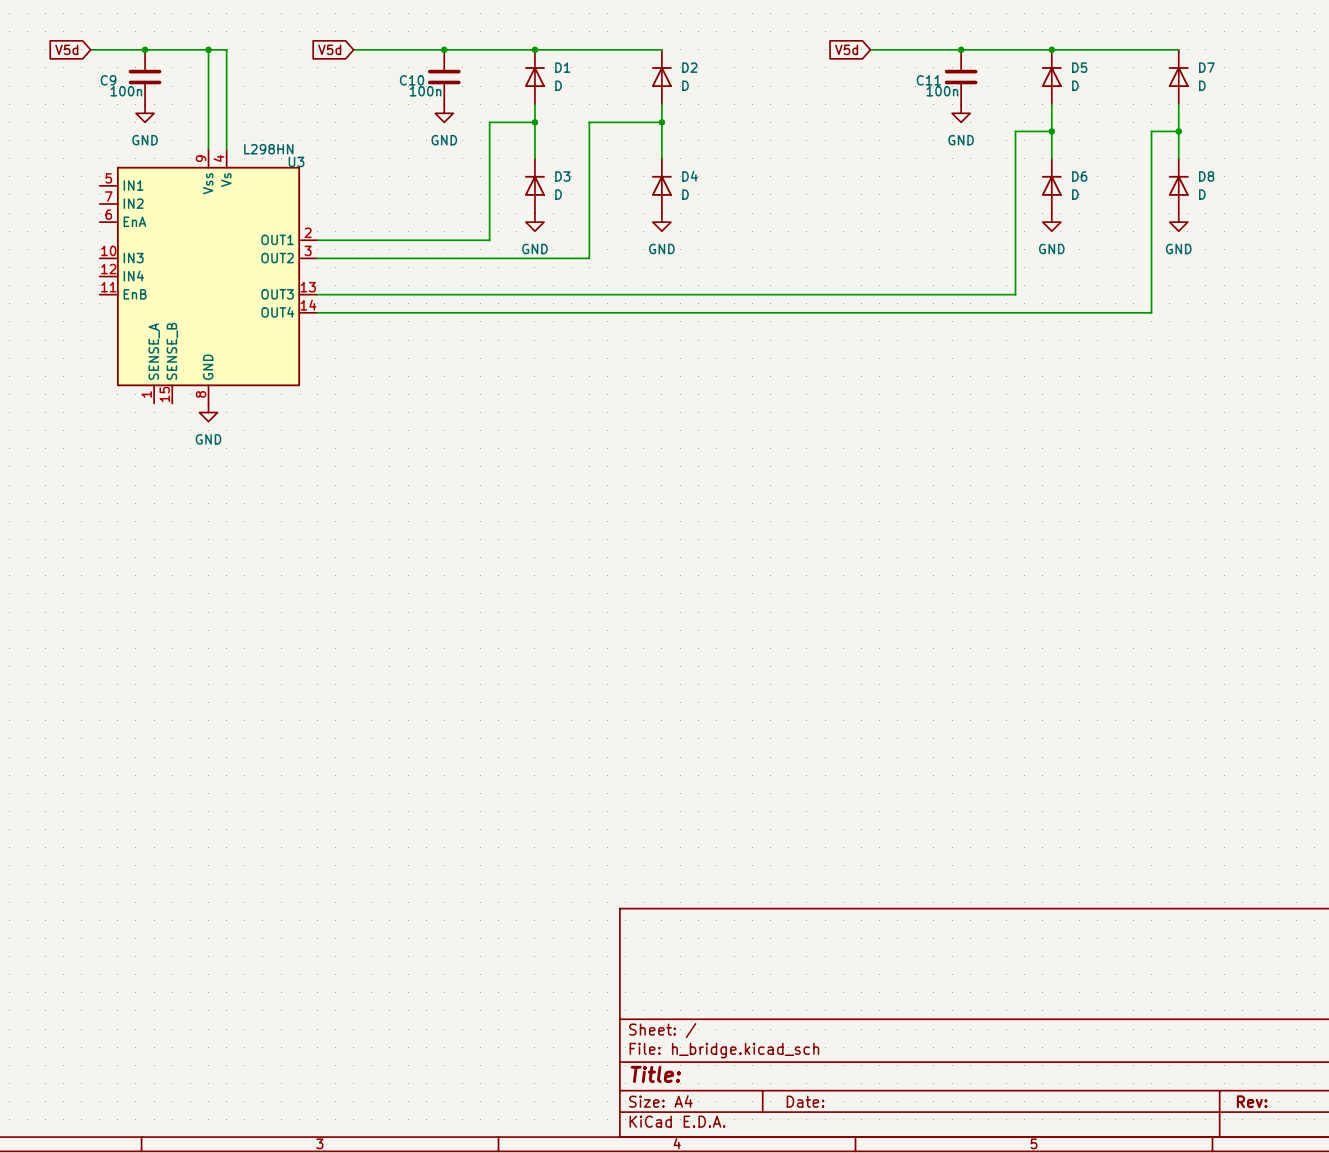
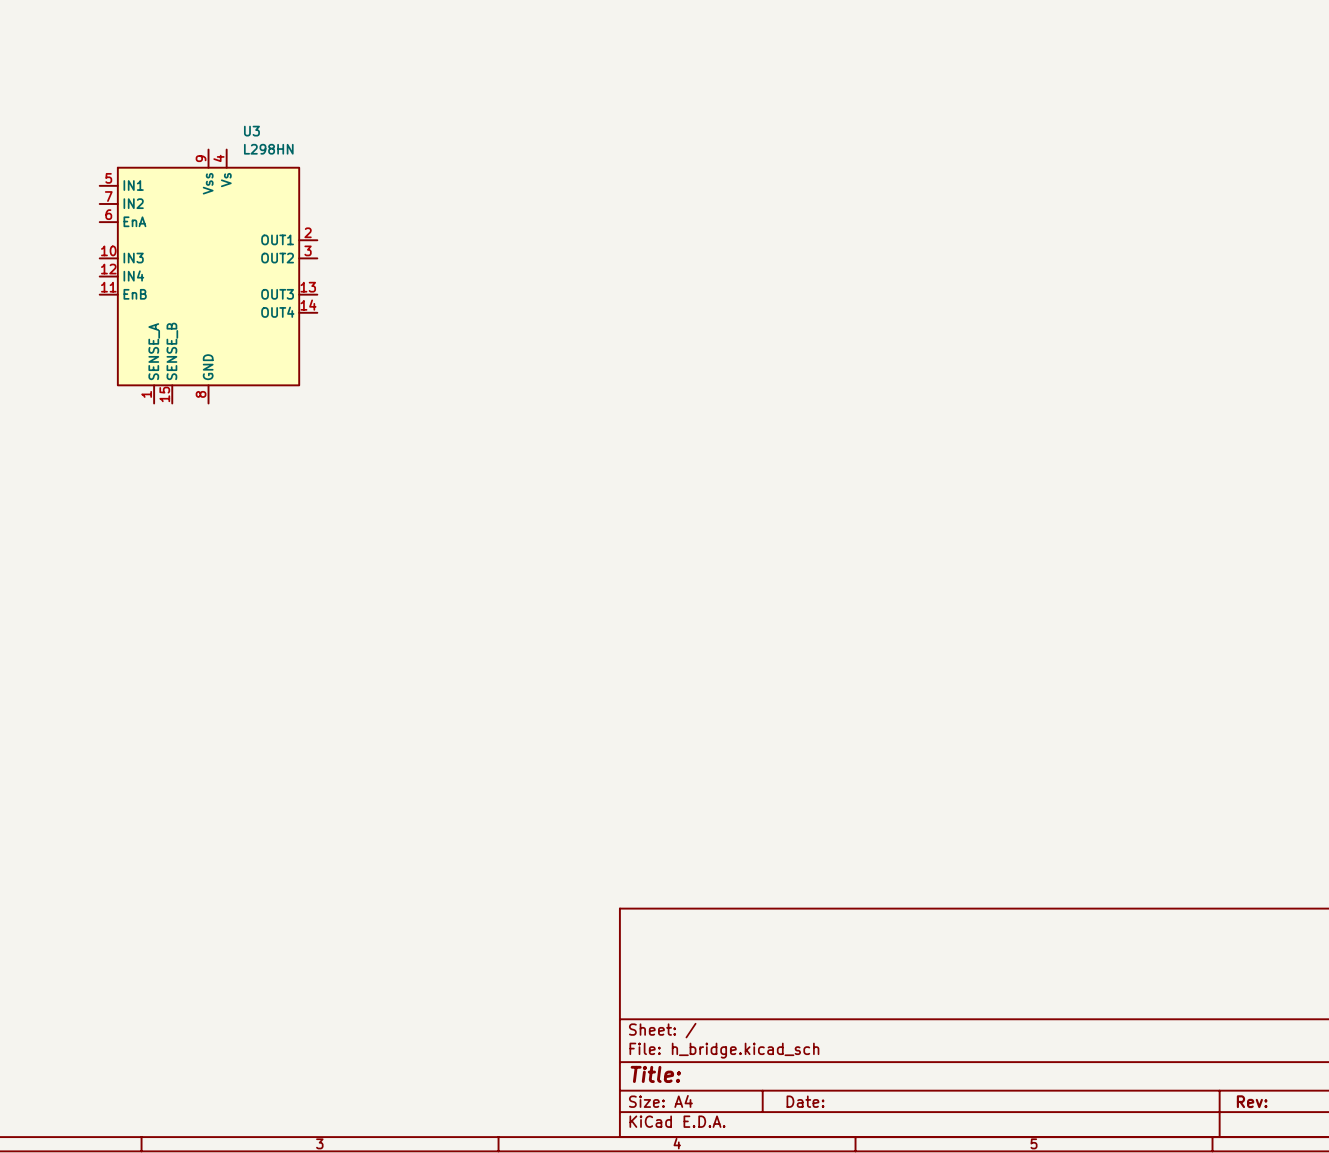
global label: V5d (66, 49) -> none
wire: (90, 49) (226, 49) (226, 149) -> none
junction: (145, 49) -> none
wire: (208, 49) (208, 149) -> none
junction: (208, 49) -> none
global label: V5d (329, 49) -> none
wire: (353, 49) (661, 49) -> none
junction: (444, 49) -> none
junction: (534, 49) -> none
global label: V5d (846, 49) -> none
wire: (870, 49) (1178, 49) -> none
junction: (961, 49) -> none
junction: (1051, 49) -> none
C9: 100n (145, 77) -> none
C10: 100n (444, 77) -> none
D1: D (534, 77) -> none
D2: D (661, 77) -> none
C11: 100n (961, 77) -> none
D5: D (1051, 77) -> none
D7: D (1178, 77) -> none
wire: (534, 104) (534, 158) -> none
wire: (661, 104) (661, 158) -> none
wire: (1051, 104) (1051, 158) -> none
wire: (1178, 104) (1178, 158) -> none
power symbol: GND (145, 113) -> none
power symbol: GND (444, 113) -> none
power symbol: GND (961, 113) -> none
wire: (534, 122) (489, 122) (489, 240) (317, 240) -> none
junction: (534, 122) -> none
wire: (661, 122) (589, 122) (589, 258) (317, 258) -> none
junction: (661, 122) -> none
wire: (1051, 131) (1015, 131) (1015, 294) (317, 294) -> none
junction: (1051, 131) -> none
wire: (1178, 131) (1151, 131) (1151, 312) (317, 312) -> none
junction: (1178, 131) -> none
U3 name position: U3 (296, 161) -> U3 (251, 131)
D3: D (534, 185) -> none
D4: D (661, 185) -> none
D6: D (1051, 185) -> none
D8: D (1178, 185) -> none
power symbol: GND (534, 222) -> none
power symbol: GND (661, 222) -> none
power symbol: GND (1051, 222) -> none
power symbol: GND (1178, 222) -> none
power symbol: GND (208, 412) -> none

